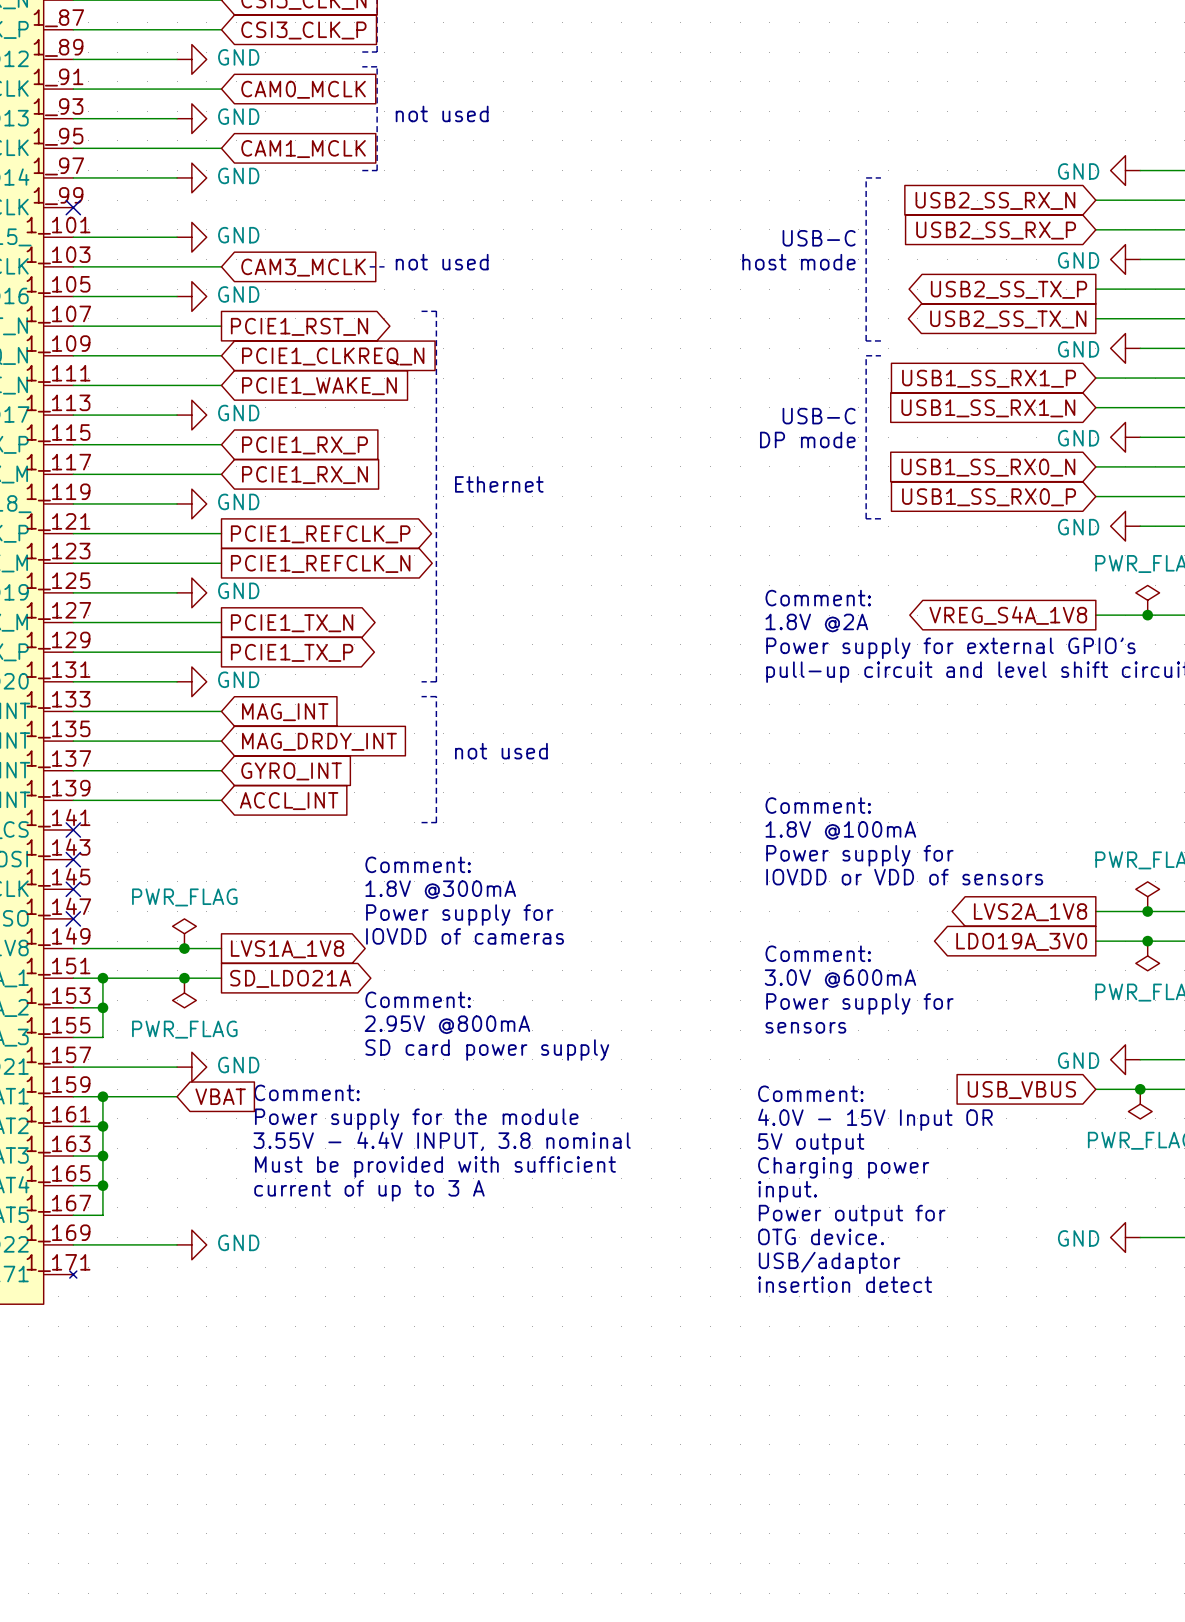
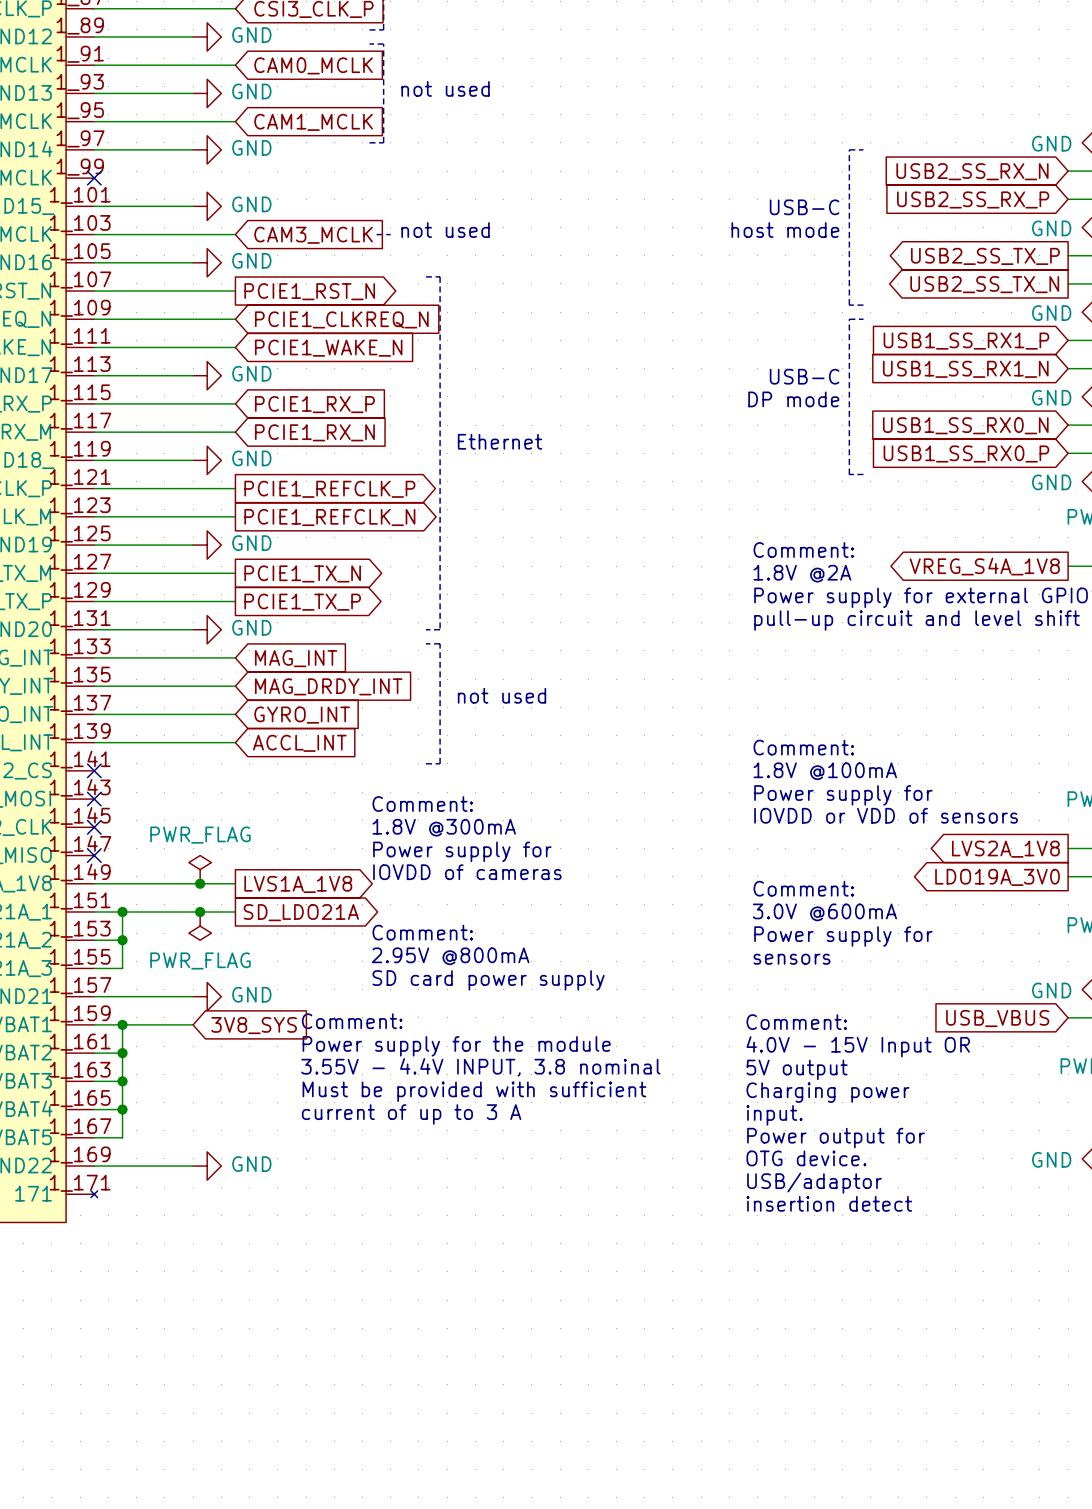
text position: Comment: (307, 1092) -> Comment: (352, 1021)
global label: VBAT (220, 1096) -> 3V8_SYS (254, 1025)
text position: Power supply for the module (416, 1119) -> Power supply for the module (456, 1046)
text position: 3.55V - 4.4V INPUT, 3.8 nominal (442, 1141) -> 3.55V - 4.4V INPUT, 3.8 nominal (480, 1067)
text position: Must be provided with sufficient (435, 1166) -> Must be provided with sufficient (474, 1091)
text position: current of up to 3 A (369, 1190) -> current of up to 3 A (411, 1114)

